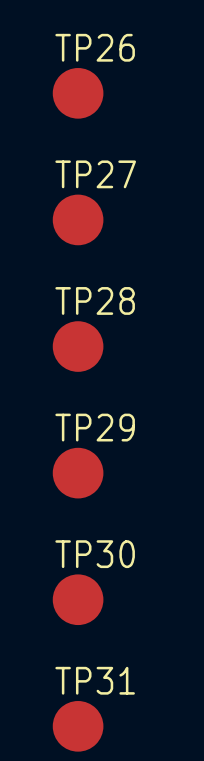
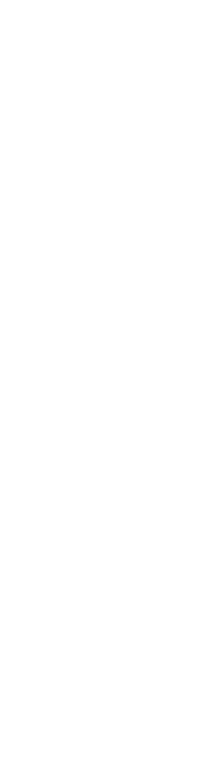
TP26: (78, 93) -> none
TP27: (78, 219) -> none
TP28: (78, 346) -> none
TP29: (78, 473) -> none
TP30: (78, 599) -> none
TP31: (78, 726) -> none

